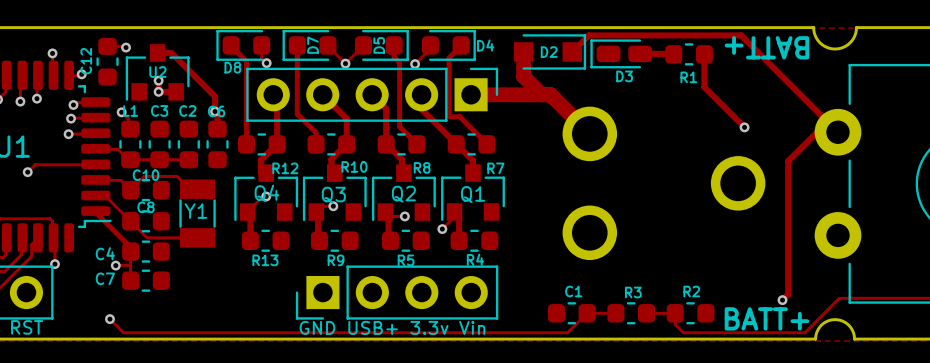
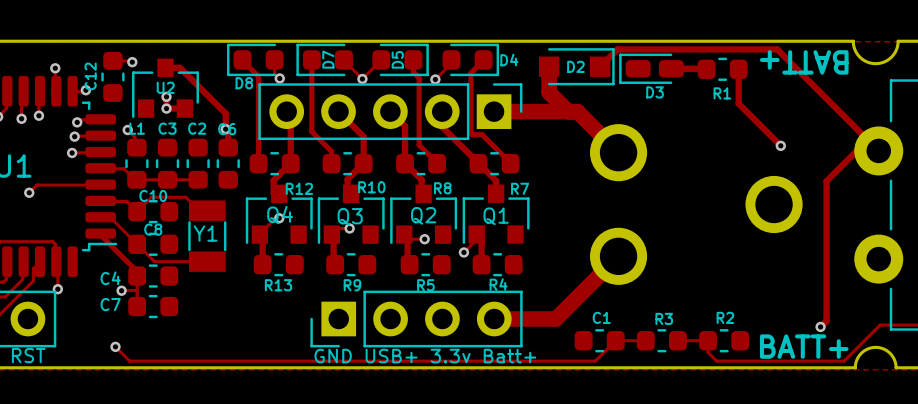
track: none -> (618, 256) (555, 318) (494, 318)
text: GND USB+ 3.3v Vin (392, 327) -> GND USB+ 3.3v Batt+ (425, 356)

